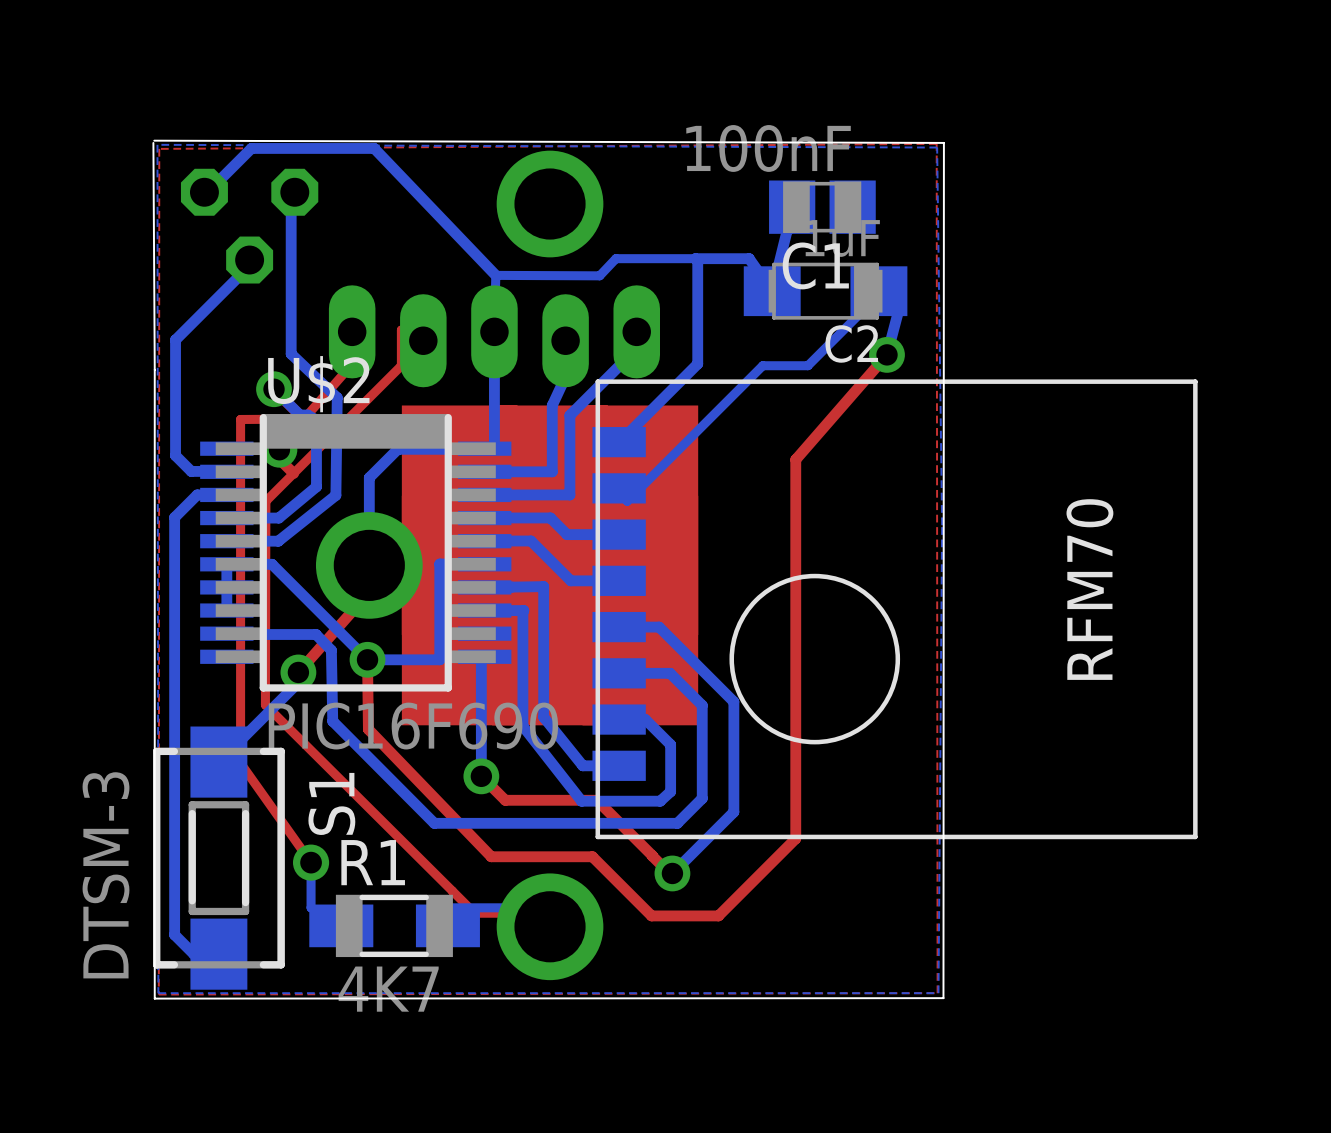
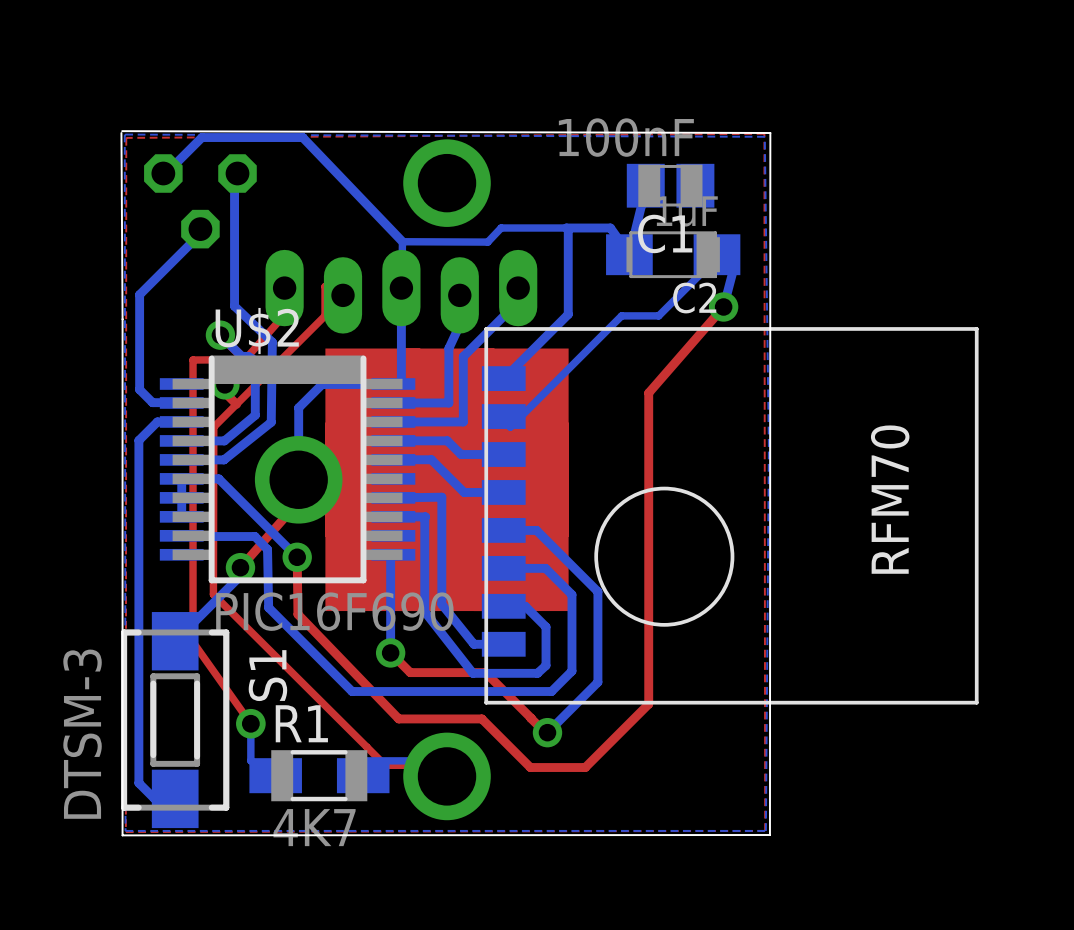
bottom track: (484, 564) (439, 564) (439, 659) (367, 659) -> none

